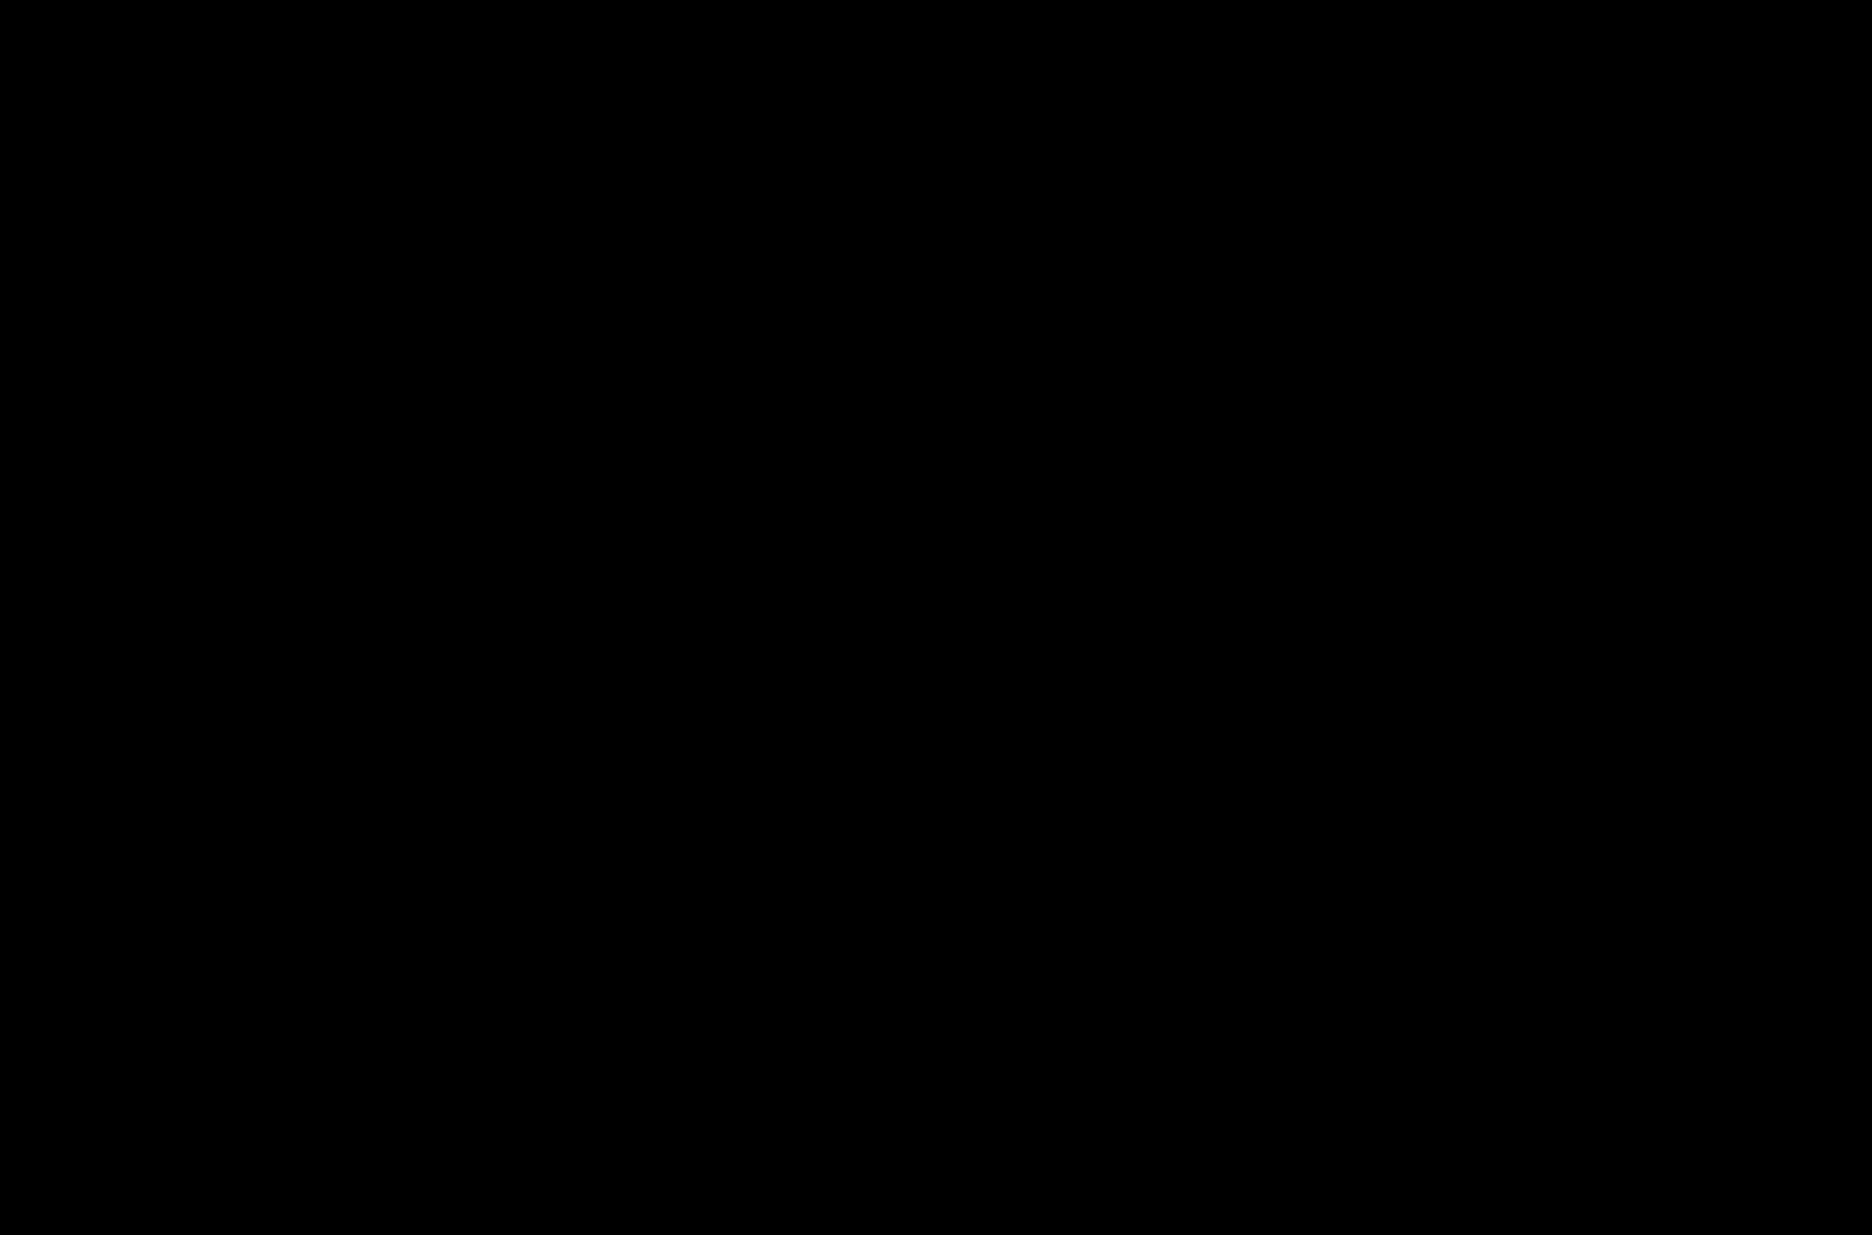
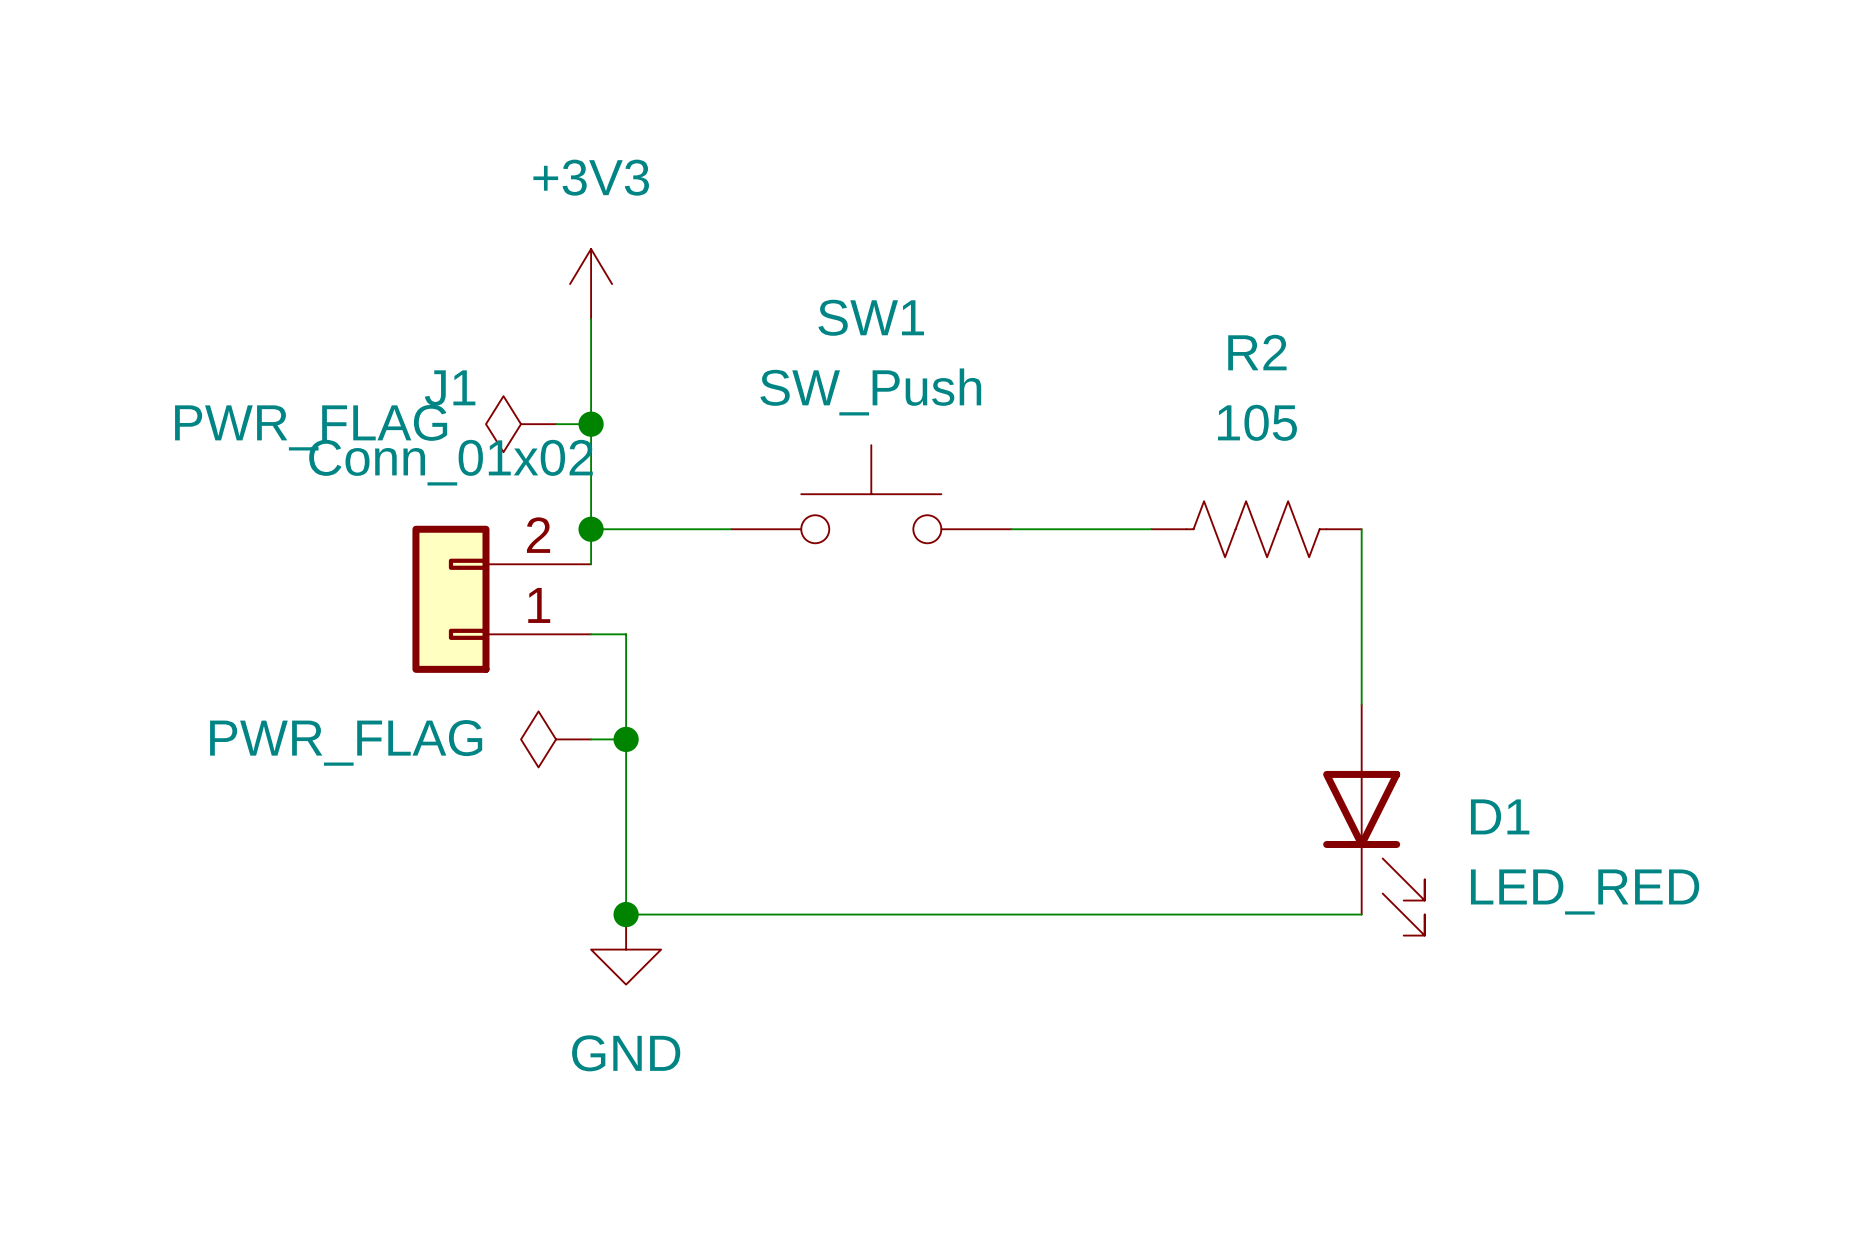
power symbol: none -> +3V3 (591, 284)
wire: none -> (591, 319) (591, 564)
power symbol: none -> PWR_FLAG (521, 424)
wire: none -> (556, 424) (591, 424)
junction: none -> (591, 424)
SW1: none -> SW_Push (871, 494)
wire: none -> (591, 529) (731, 529)
junction: none -> (591, 529)
wire: none -> (1011, 529) (1151, 529)
R2: none -> 105 (1256, 529)
wire: none -> (1361, 529) (1361, 704)
J1: none -> Conn_01x02 (501, 599)
wire: none -> (591, 634) (626, 634) (626, 914) (1361, 914)
power symbol: none -> PWR_FLAG (556, 739)
wire: none -> (591, 739) (626, 739)
junction: none -> (626, 739)
D1: none -> LED_RED (1373, 819)
junction: none -> (626, 914)
power symbol: none -> GND (626, 949)

